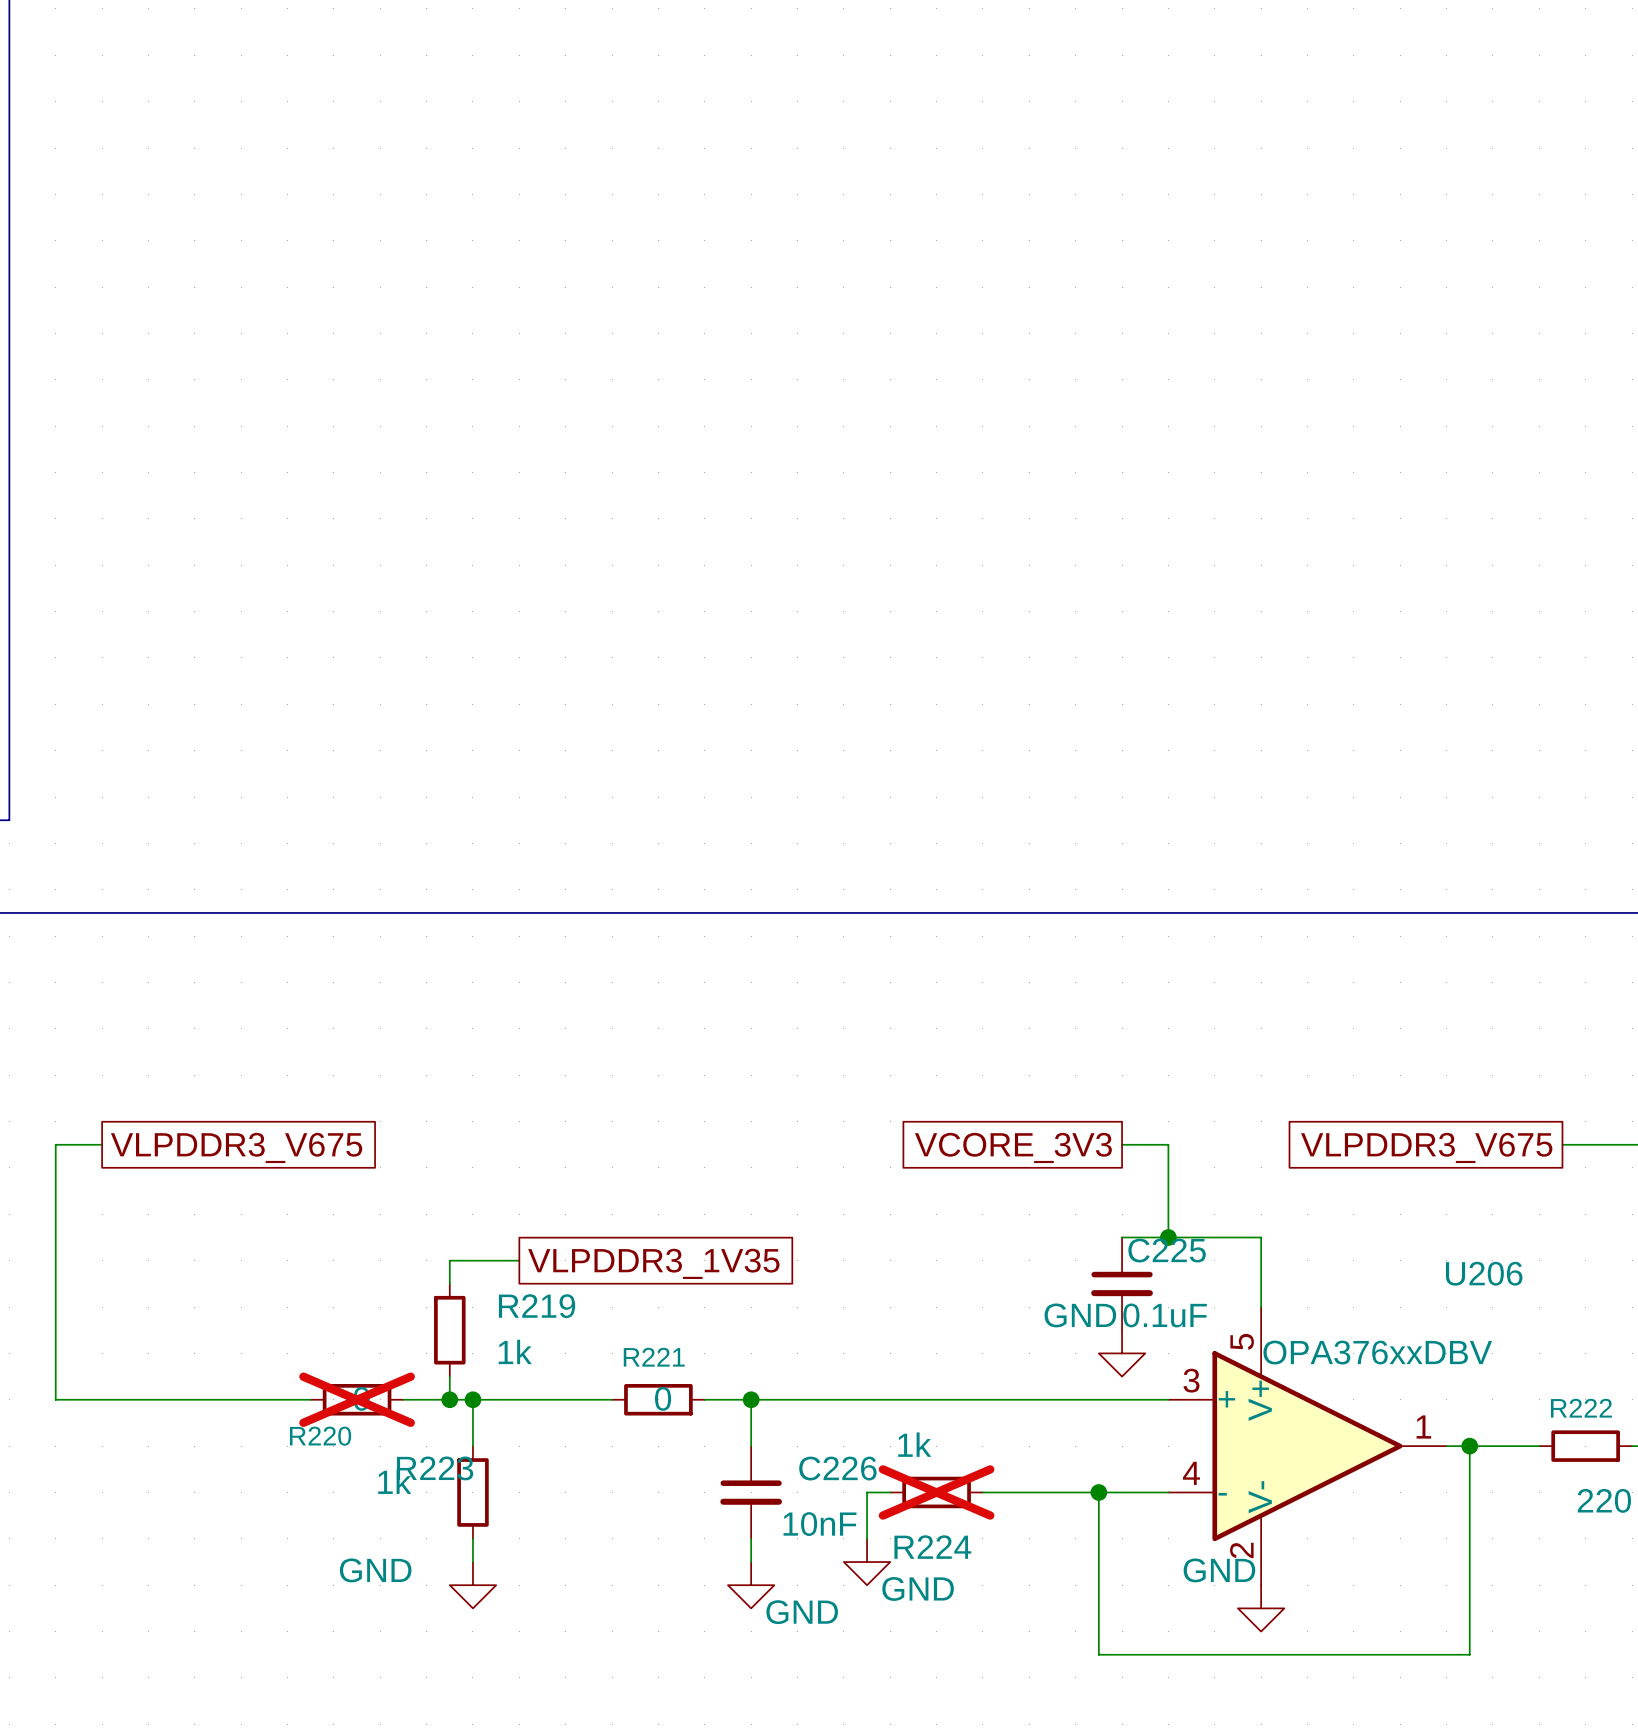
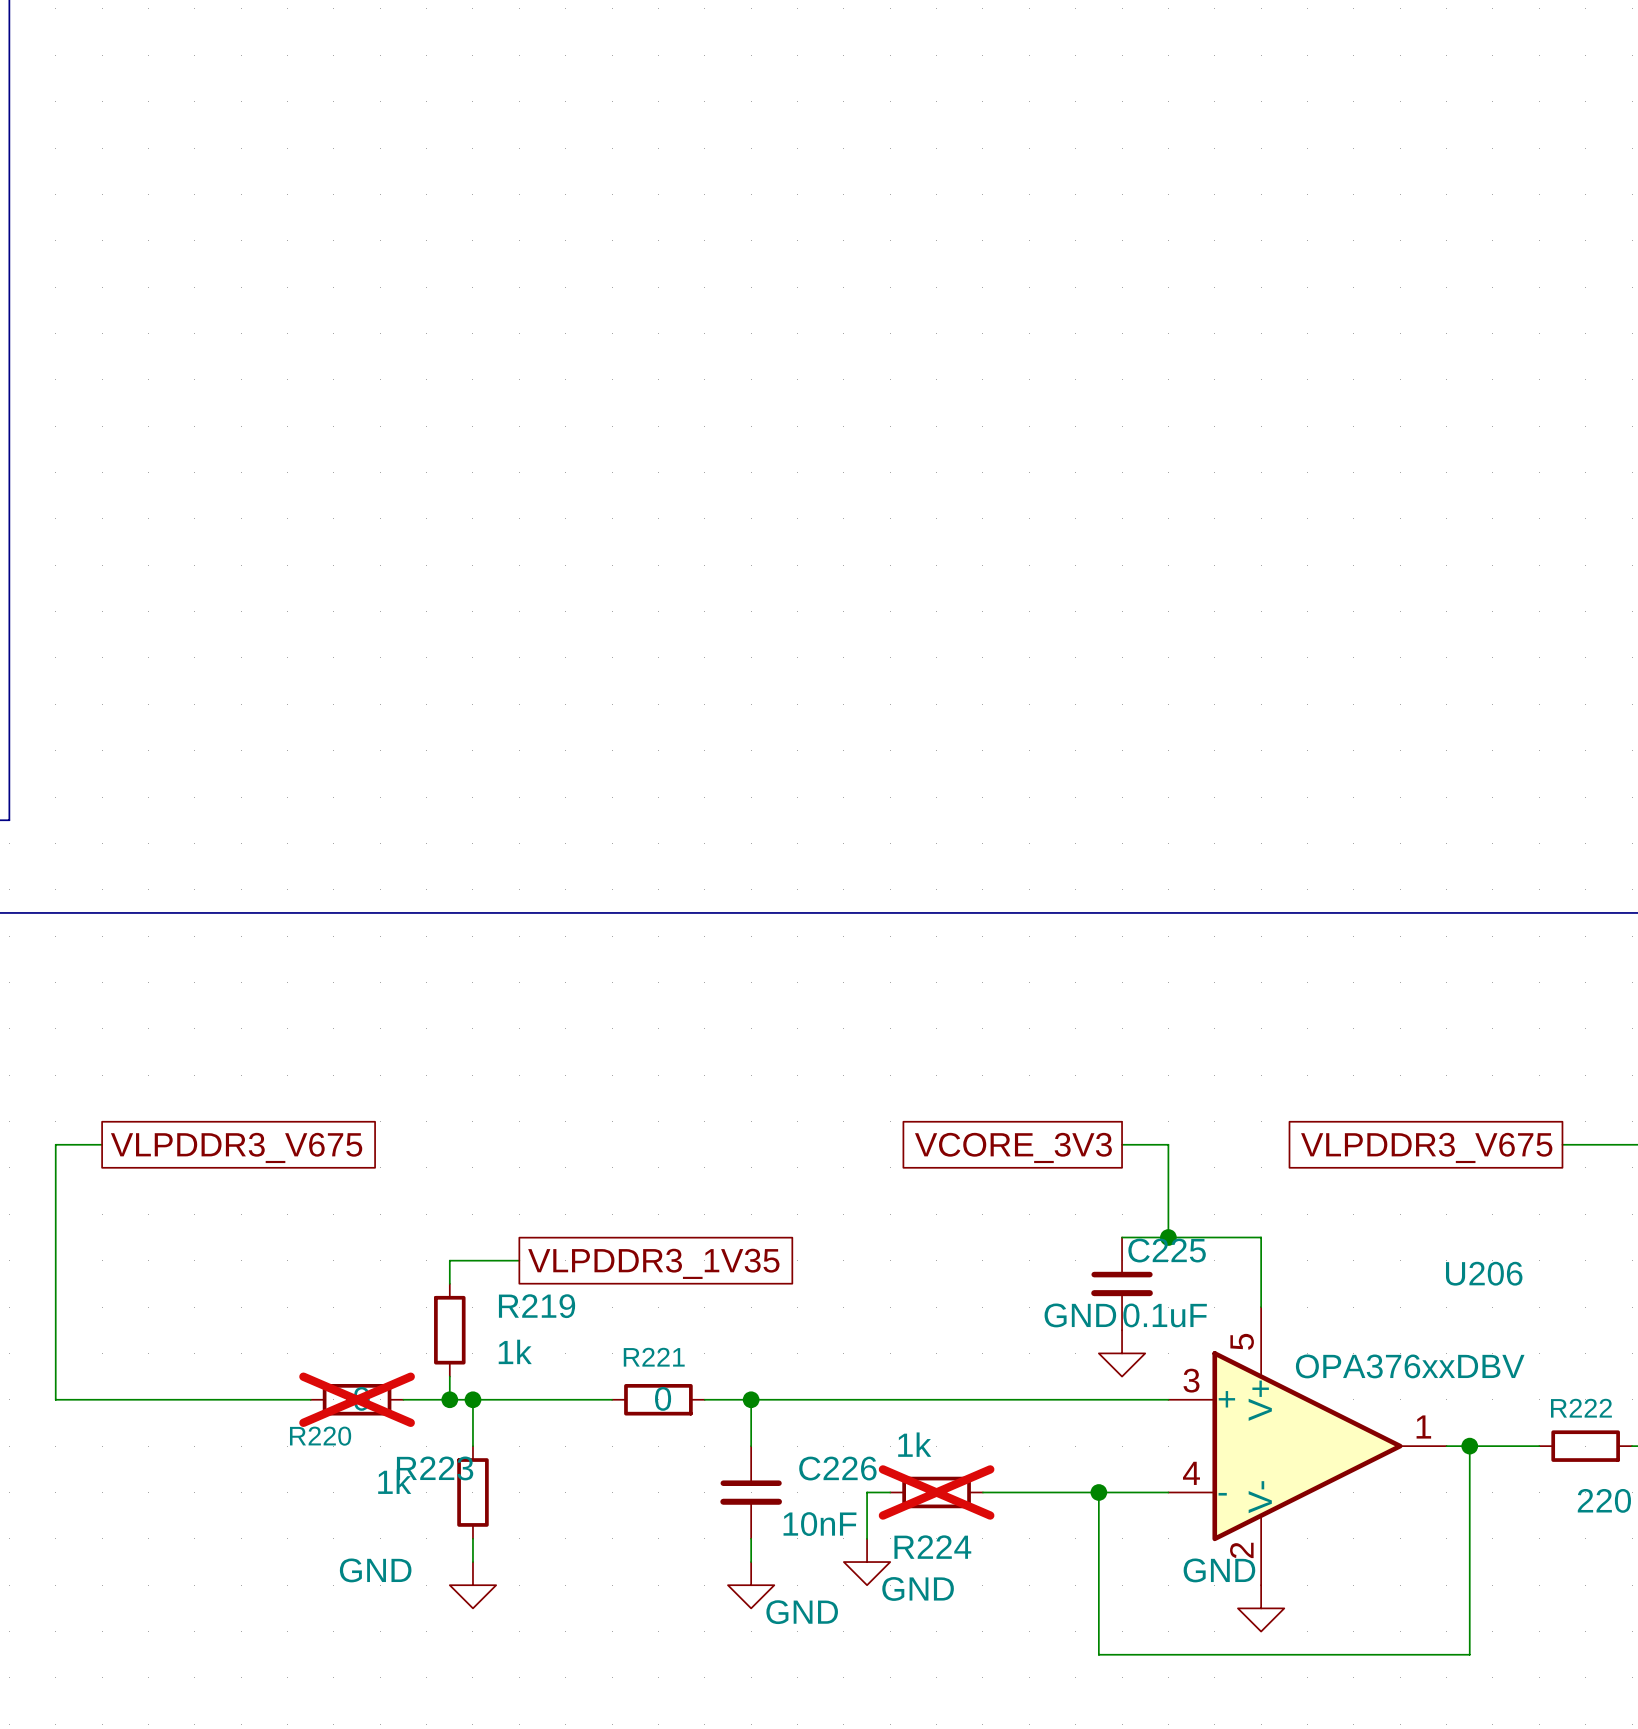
U206 value position: OPA376xxDBV (1377, 1352) -> OPA376xxDBV (1410, 1366)

